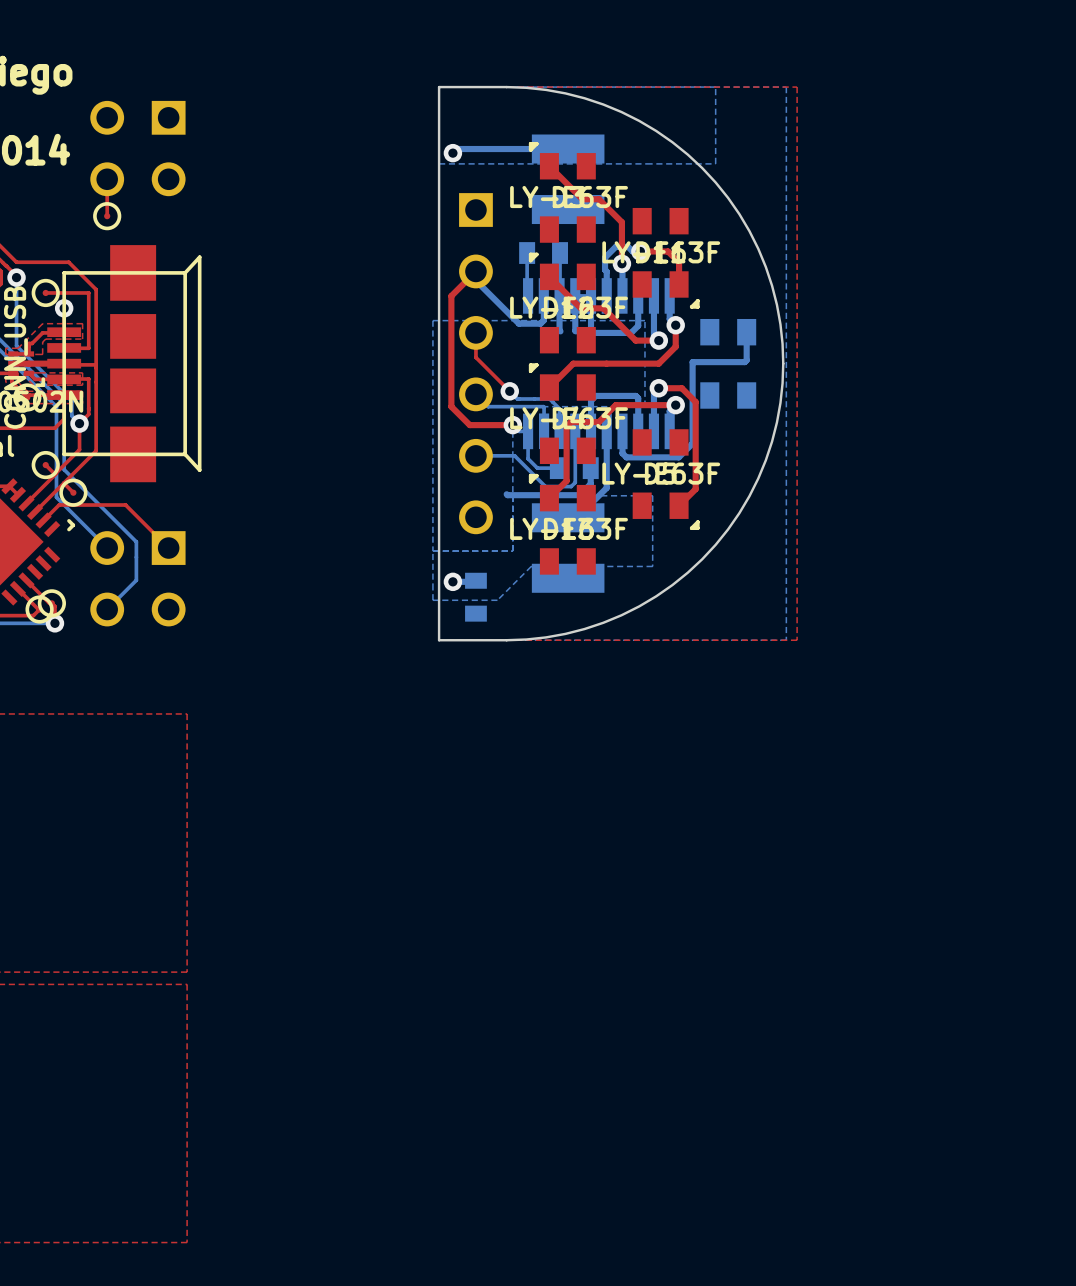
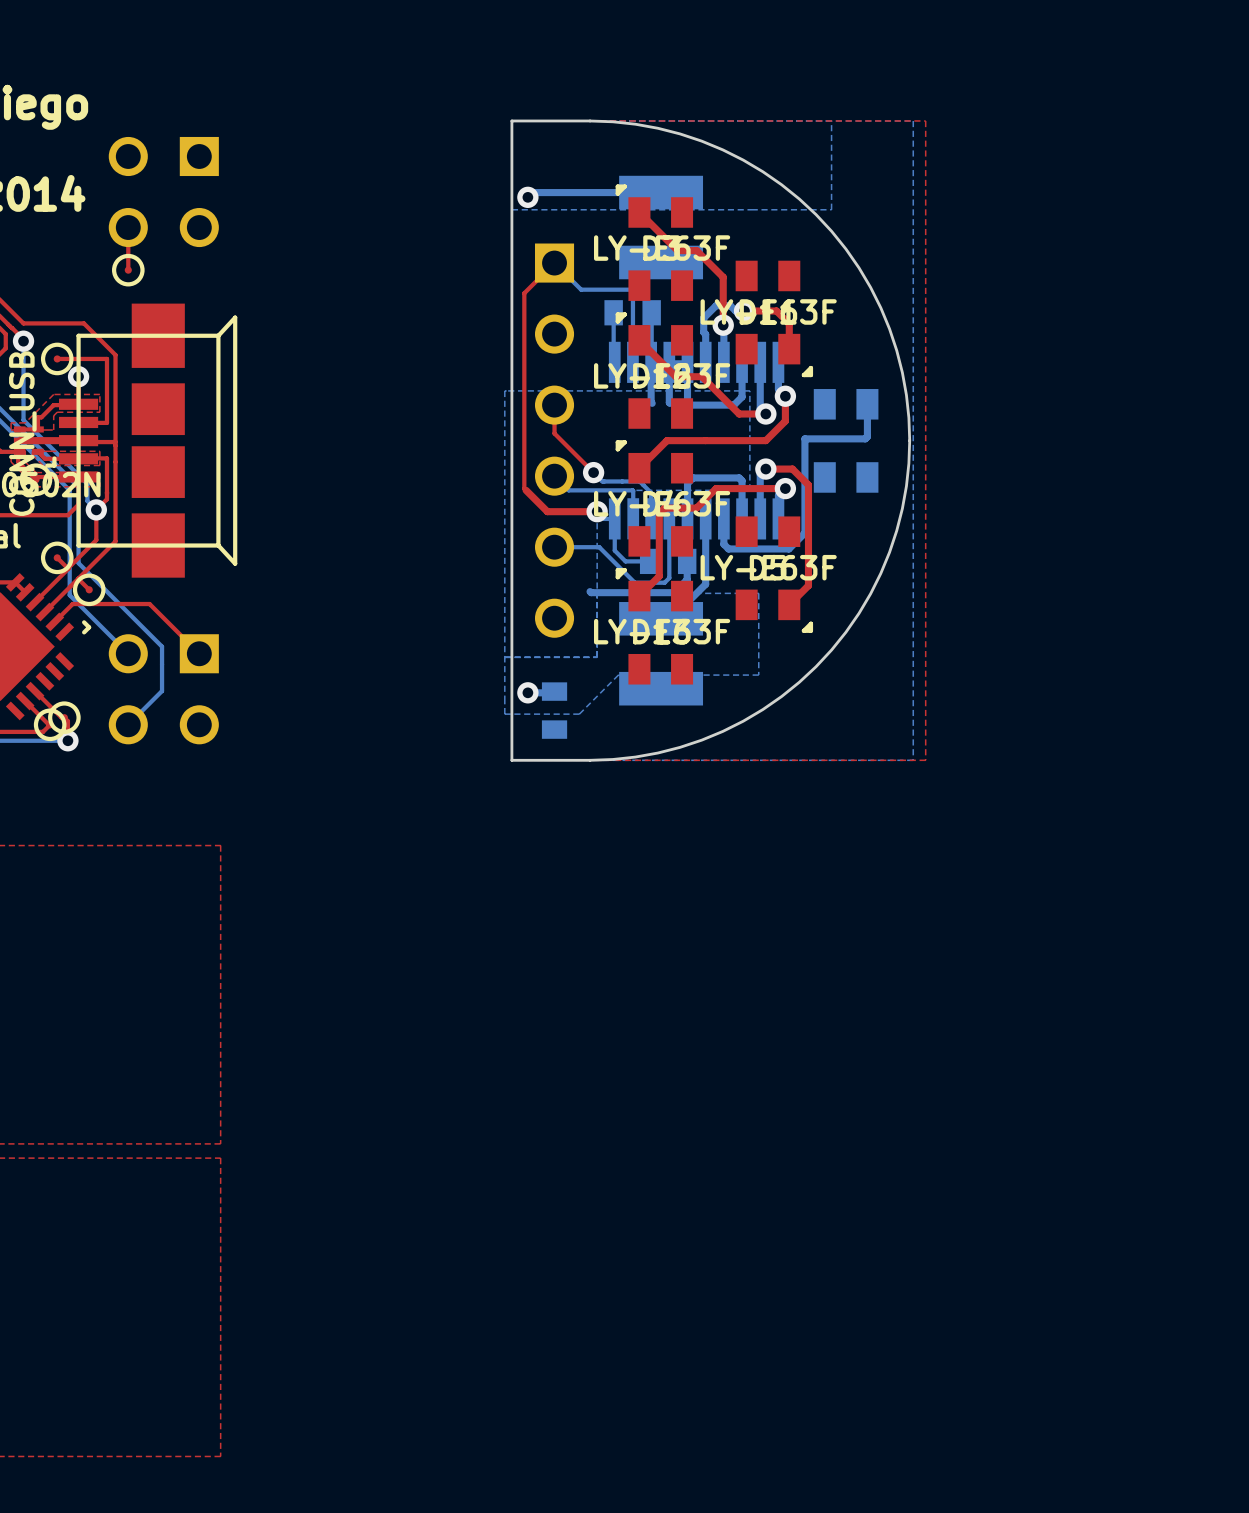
top track: (475, 271) (451, 296) (451, 406) -> (554, 263) (524, 293) (524, 488) (526, 490)
bottom track: (475, 271) (475, 280) (518, 323) (540, 323) (543, 320) (543, 295) -> (554, 263) (581, 289) (630, 289) (632, 291) (632, 362)

